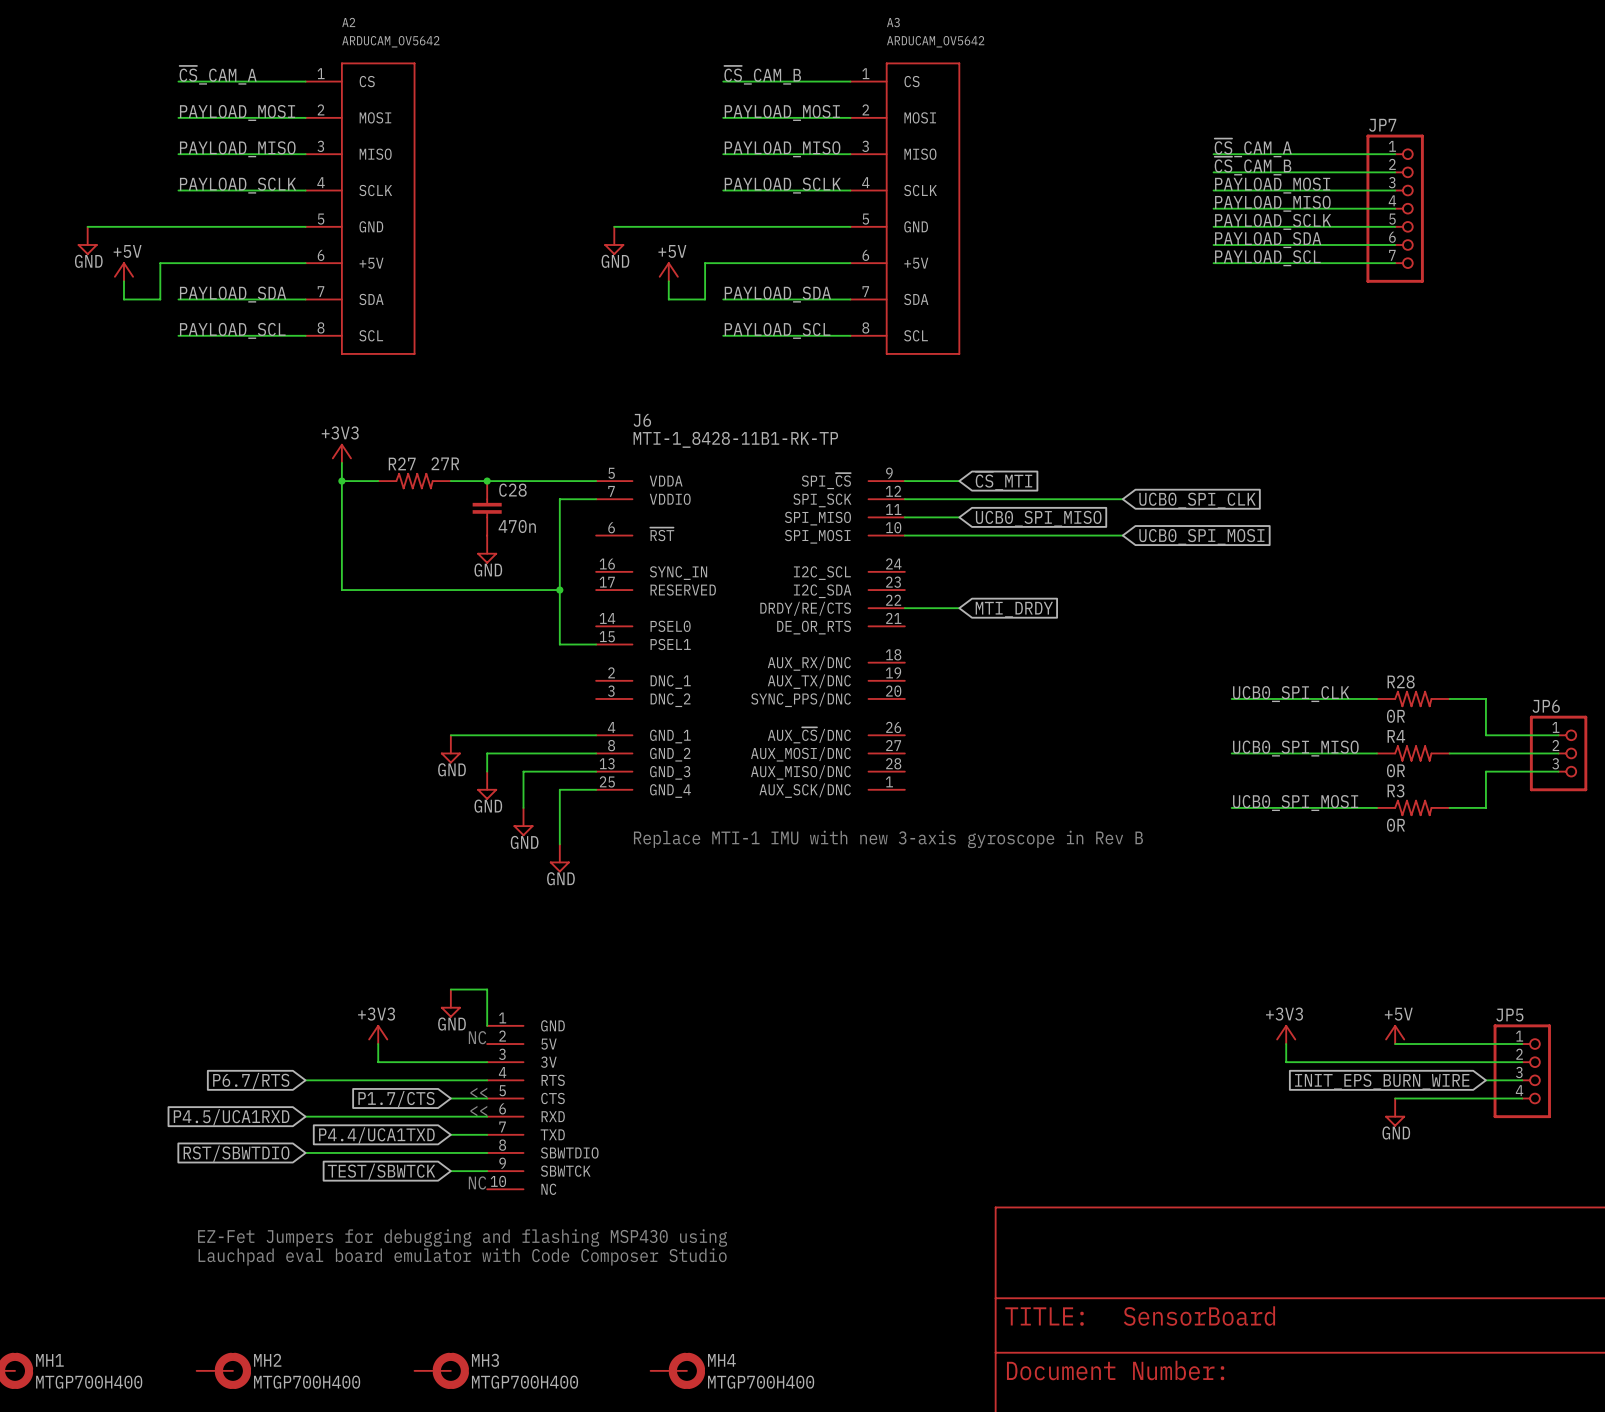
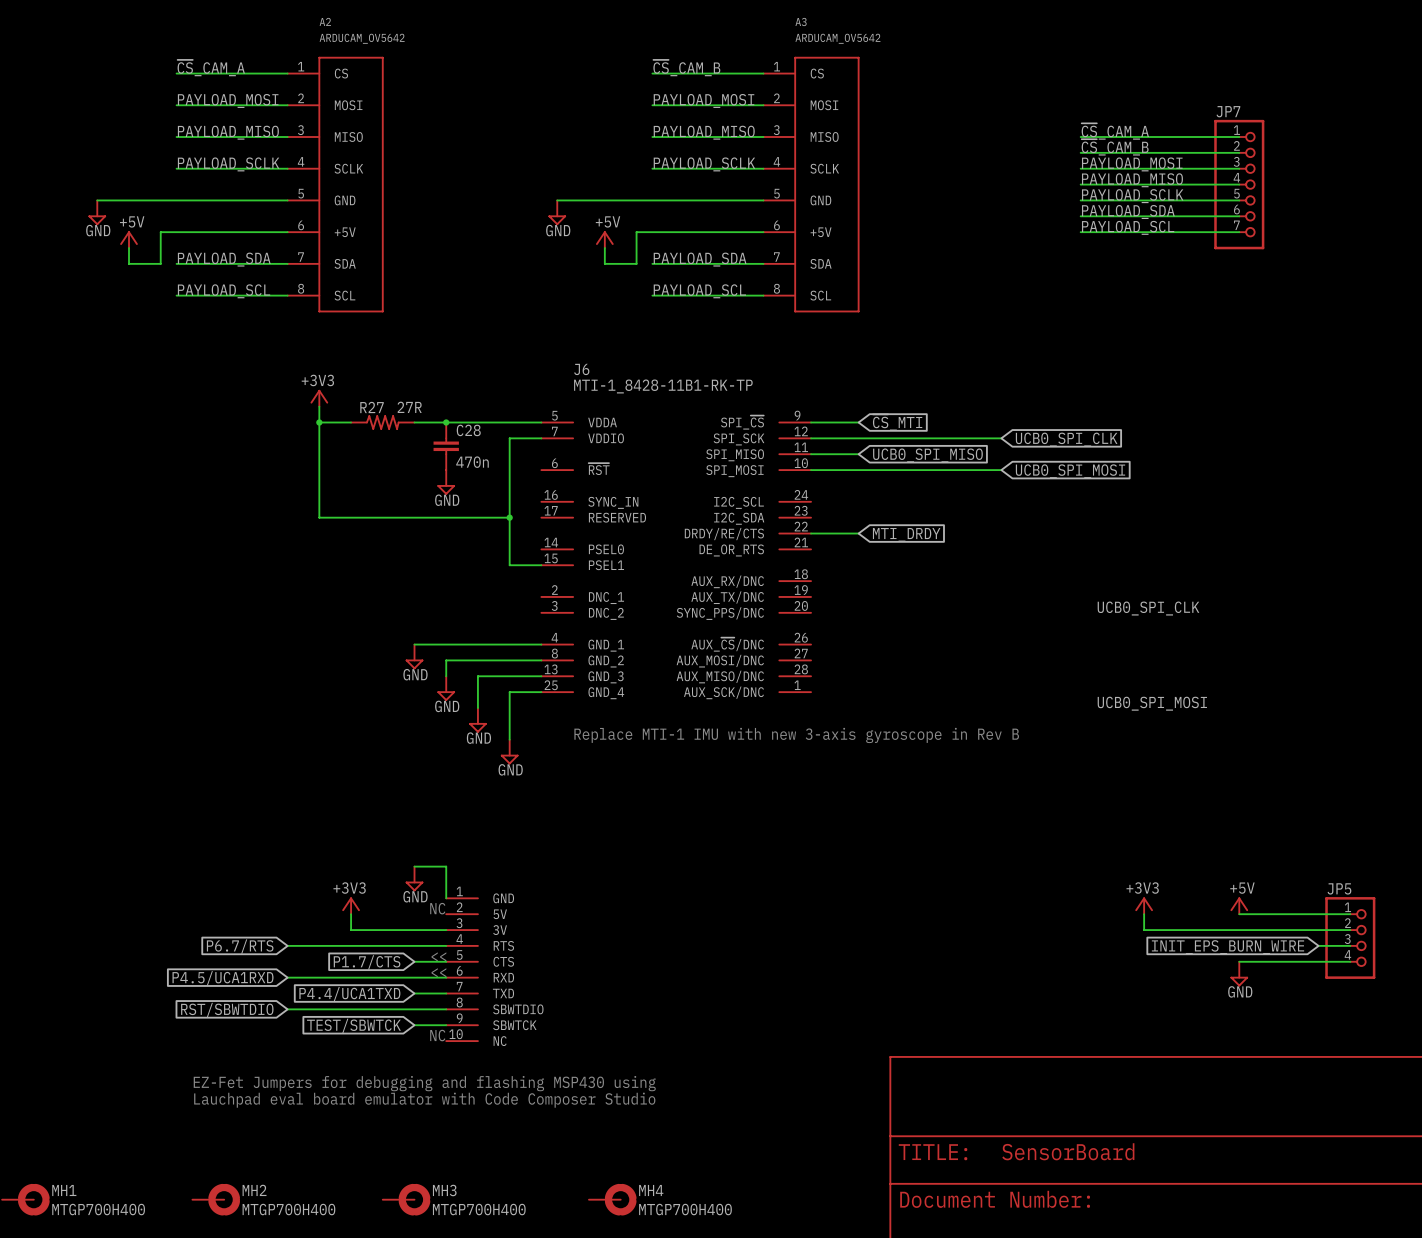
wire: (1231, 698) (1377, 698) -> none
R28: 0R (1413, 698) -> none
wire: (1449, 698) (1485, 698) (1485, 735) (1558, 735) -> none
label: UCB0_SPI_MISO (1295, 748) -> none
wire: (1231, 753) (1377, 753) -> none
R4: 0R (1413, 753) -> none
wire: (1449, 753) (1558, 753) -> none
JP6: (1558, 753) -> none
wire: (1558, 771) (1485, 771) (1485, 807) (1449, 807) -> none
wire: (1231, 807) (1377, 807) -> none
R3: 0R (1413, 807) -> none

